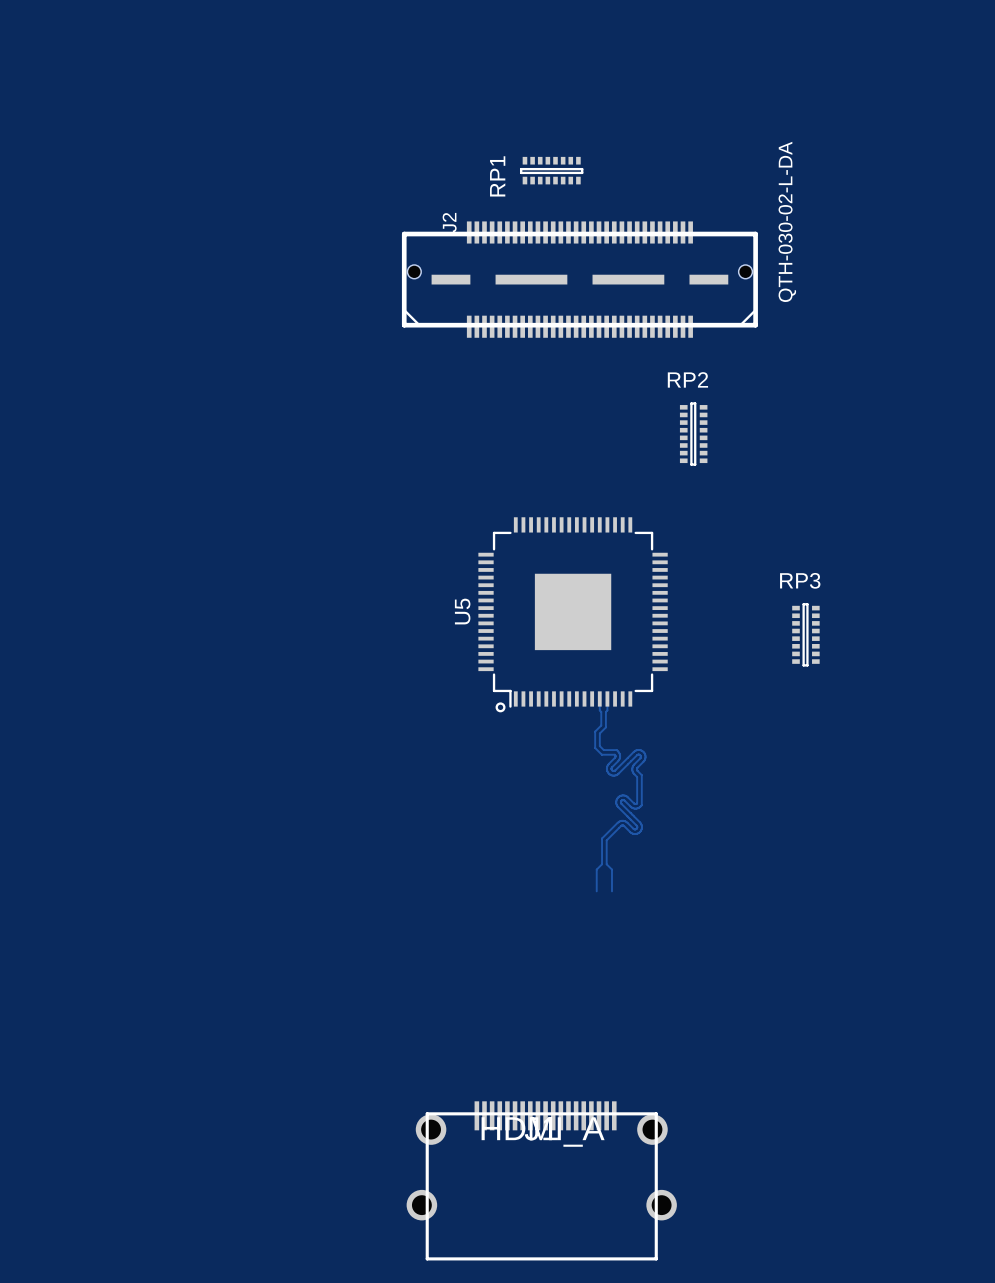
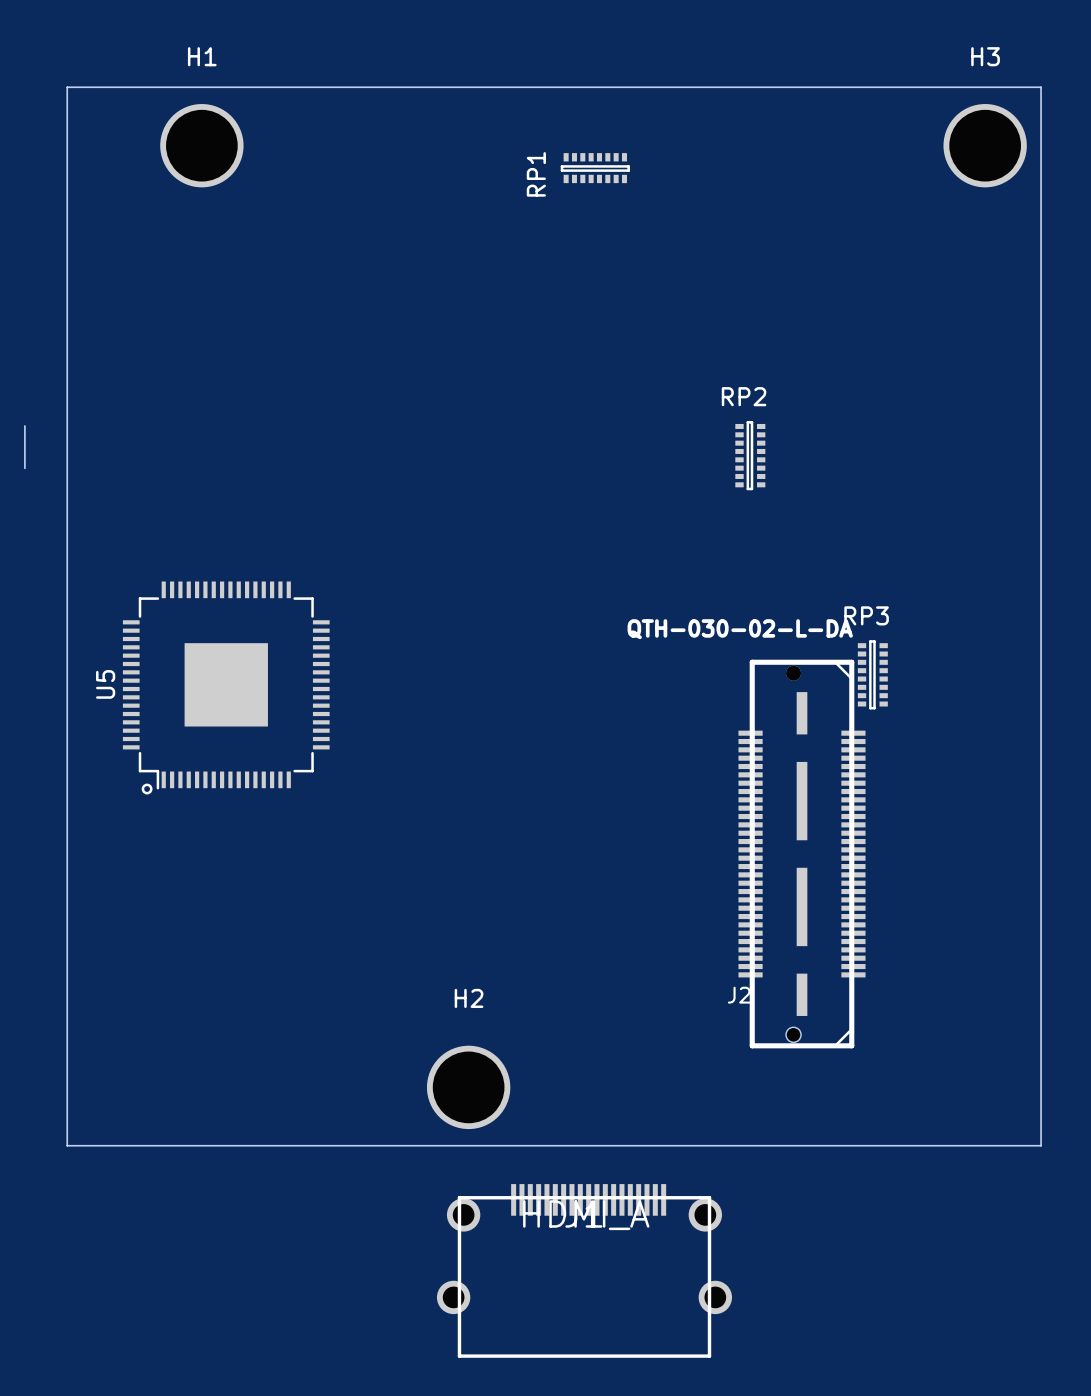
board edge: none -> (67, 87) (1041, 87) (1041, 1145) (67, 1145) (67, 87)
H1: none -> (201, 145)
H3: none -> (985, 145)
J2 footprint: [401, 221, 758, 338] -> [738, 659, 866, 1049]
J2 value position: QTH-030-02-L-DA (787, 221) -> QTH-030-02-L-DA (740, 629)
J2 name position: J2 (449, 222) -> J2 (739, 995)
board edge: none -> (24, 425) (24, 468)
U5 position: (573, 614) -> (226, 687)
track: (599, 698) (601, 725) (595, 731) (595, 748) (601, 754) (615, 755) (607, 766) (607, 772) (611, 775) (616, 775) (637, 754) (640, 757) (632, 768) (637, 777) (637, 803) (634, 803) (623, 795) (618, 797) (616, 801) (617, 805) (637, 827) (634, 829) (626, 821) (620, 821) (602, 838) (602, 864) (596, 869) (596, 891) -> none
track: (607, 698) (605, 727) (599, 733) (599, 746) (603, 750) (616, 750) (619, 752) (619, 758) (611, 769) (615, 770) (636, 750) (642, 750) (645, 756) (644, 760) (636, 769) (641, 775) (641, 805) (634, 808) (623, 800) (620, 802) (640, 823) (641, 829) (638, 833) (634, 834) (621, 825) (606, 840) (606, 864) (611, 869) (611, 891) -> none
H2: none -> (468, 1087)

